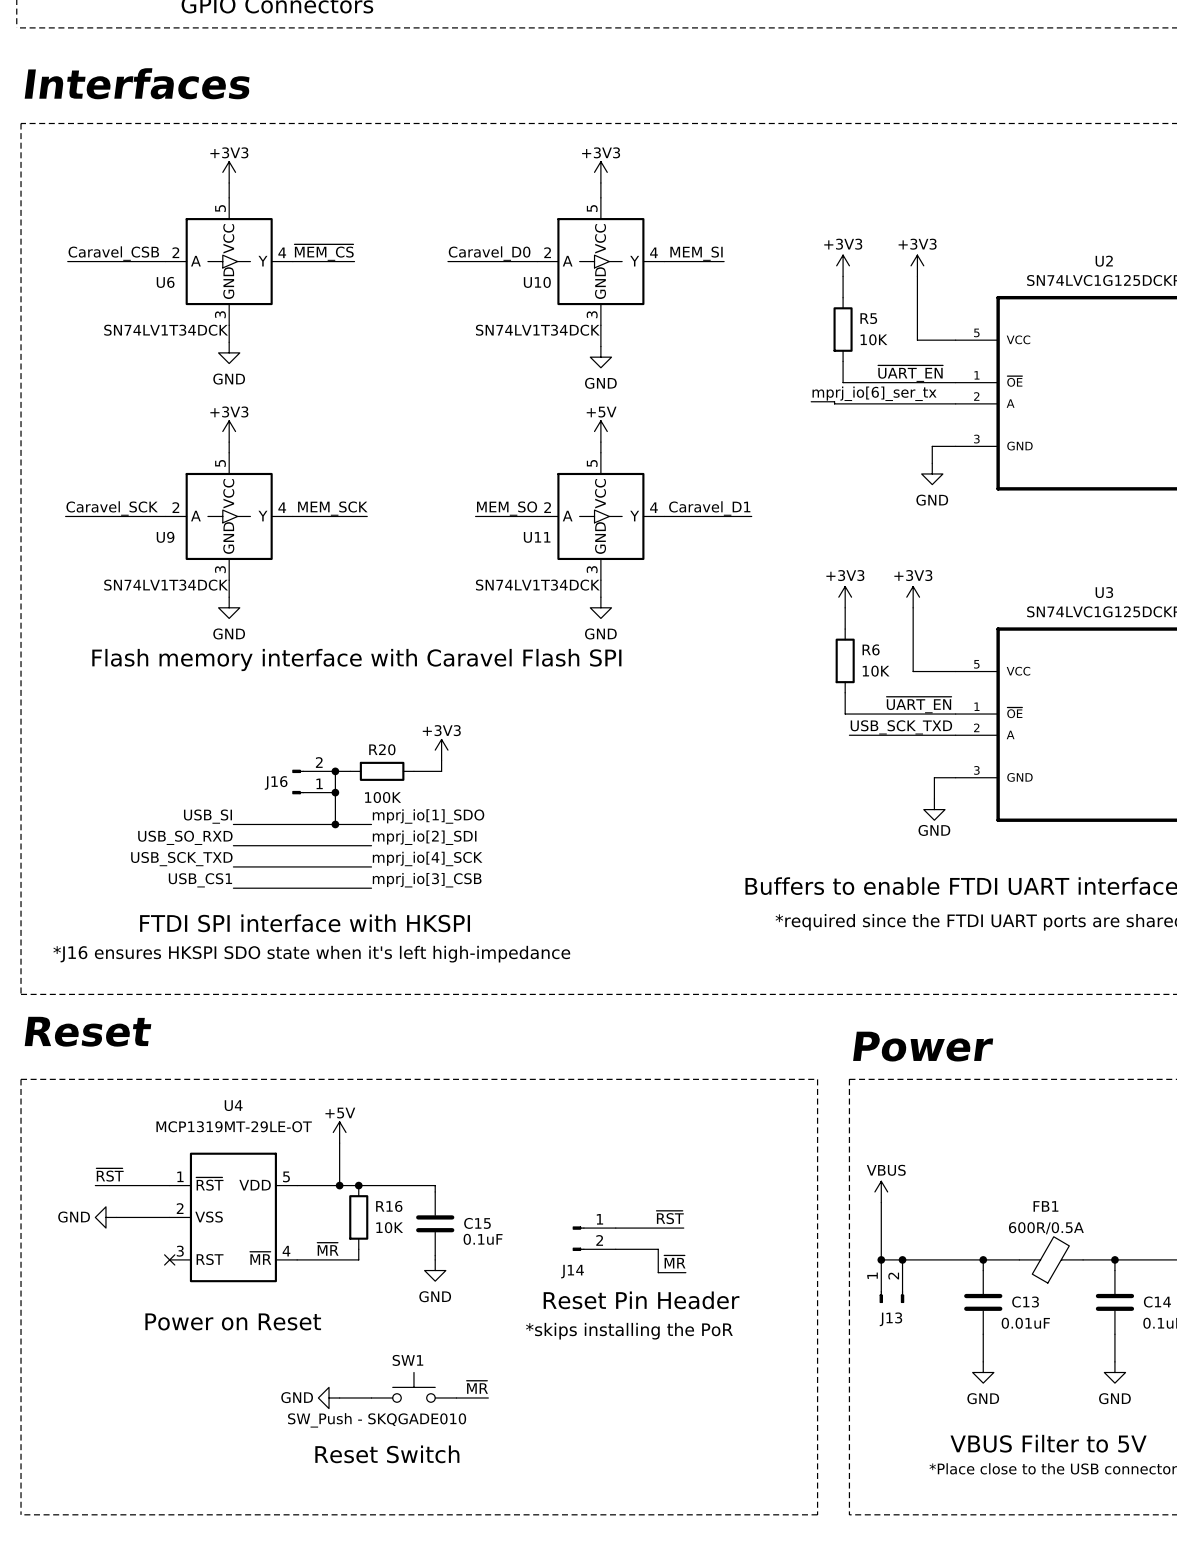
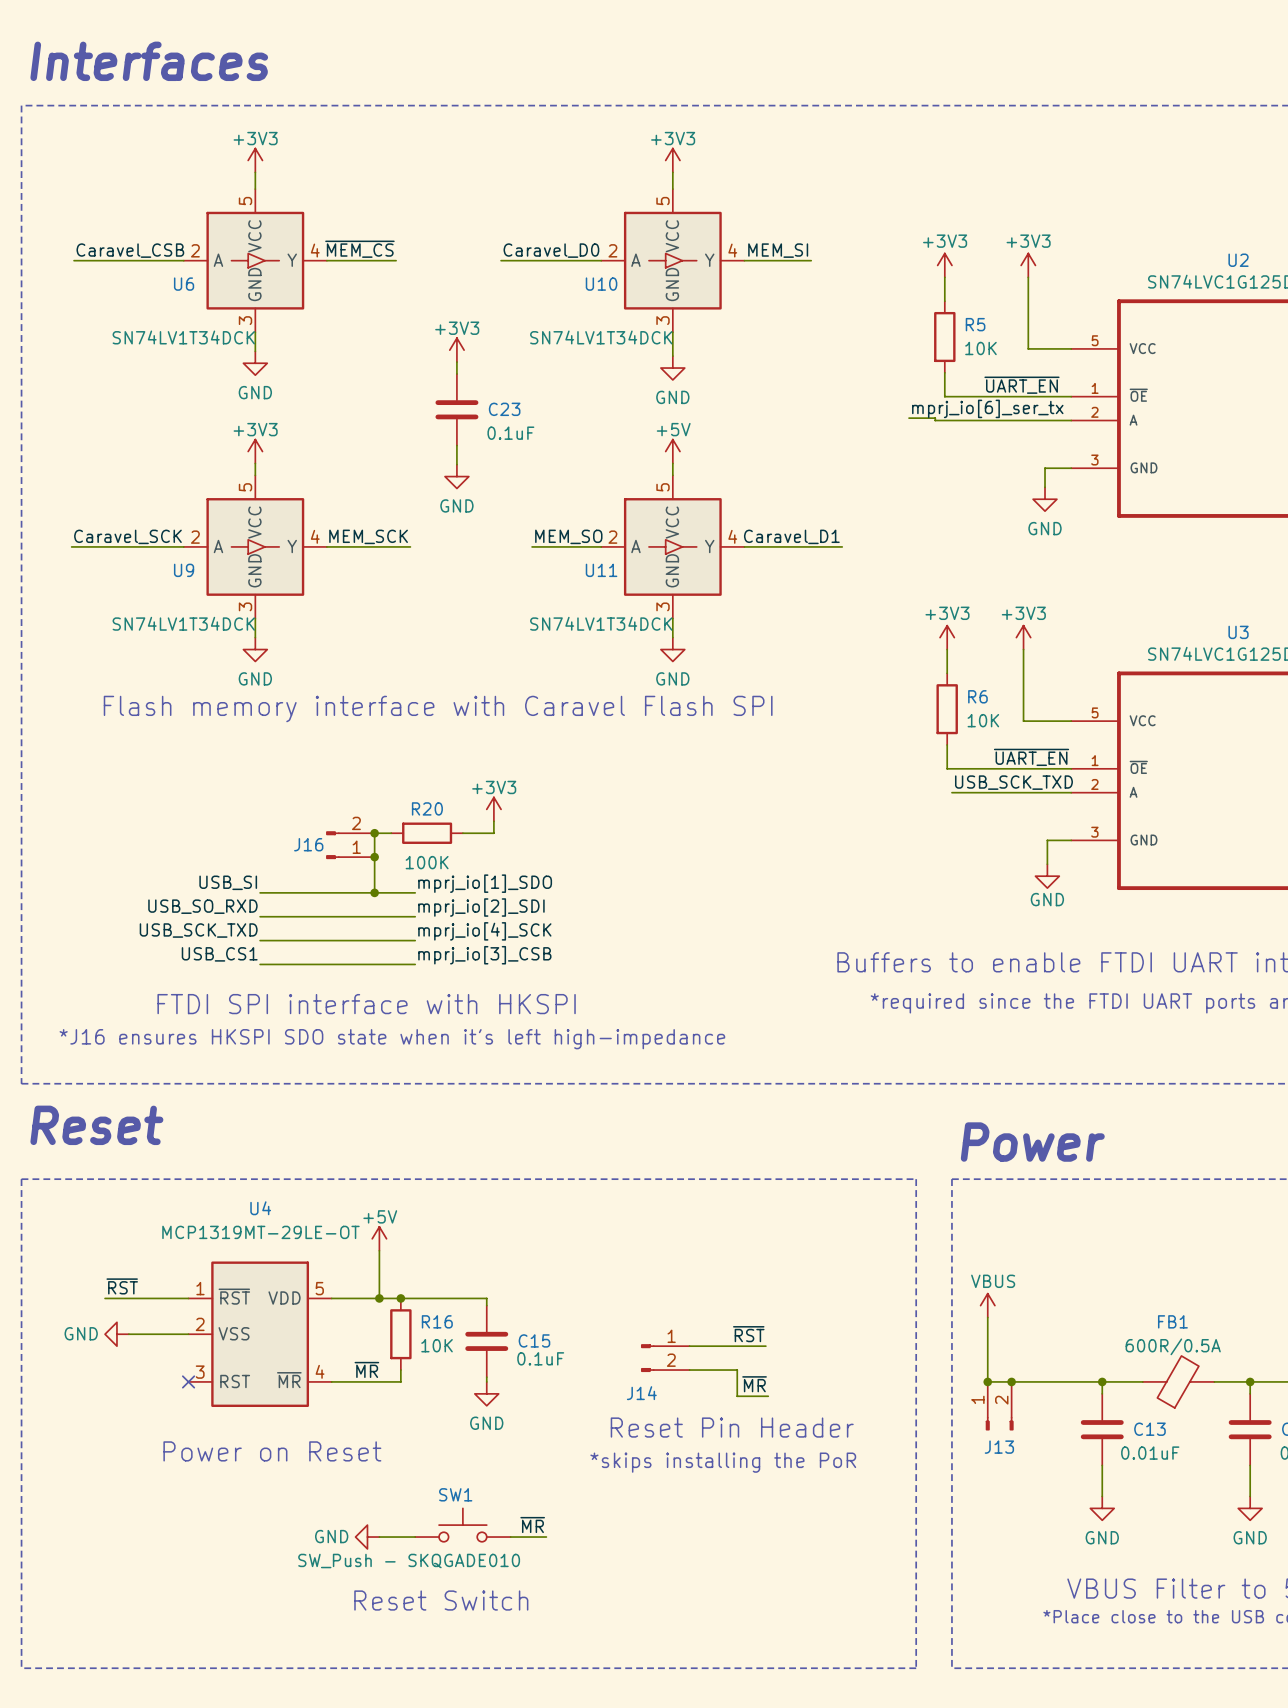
power symbol: none -> +3V3 (456, 350)
wire: none -> (456, 362) (456, 373)
C23: none -> 0.1uF (456, 409)
wire: none -> (456, 445) (456, 464)
power symbol: none -> GND (456, 476)

